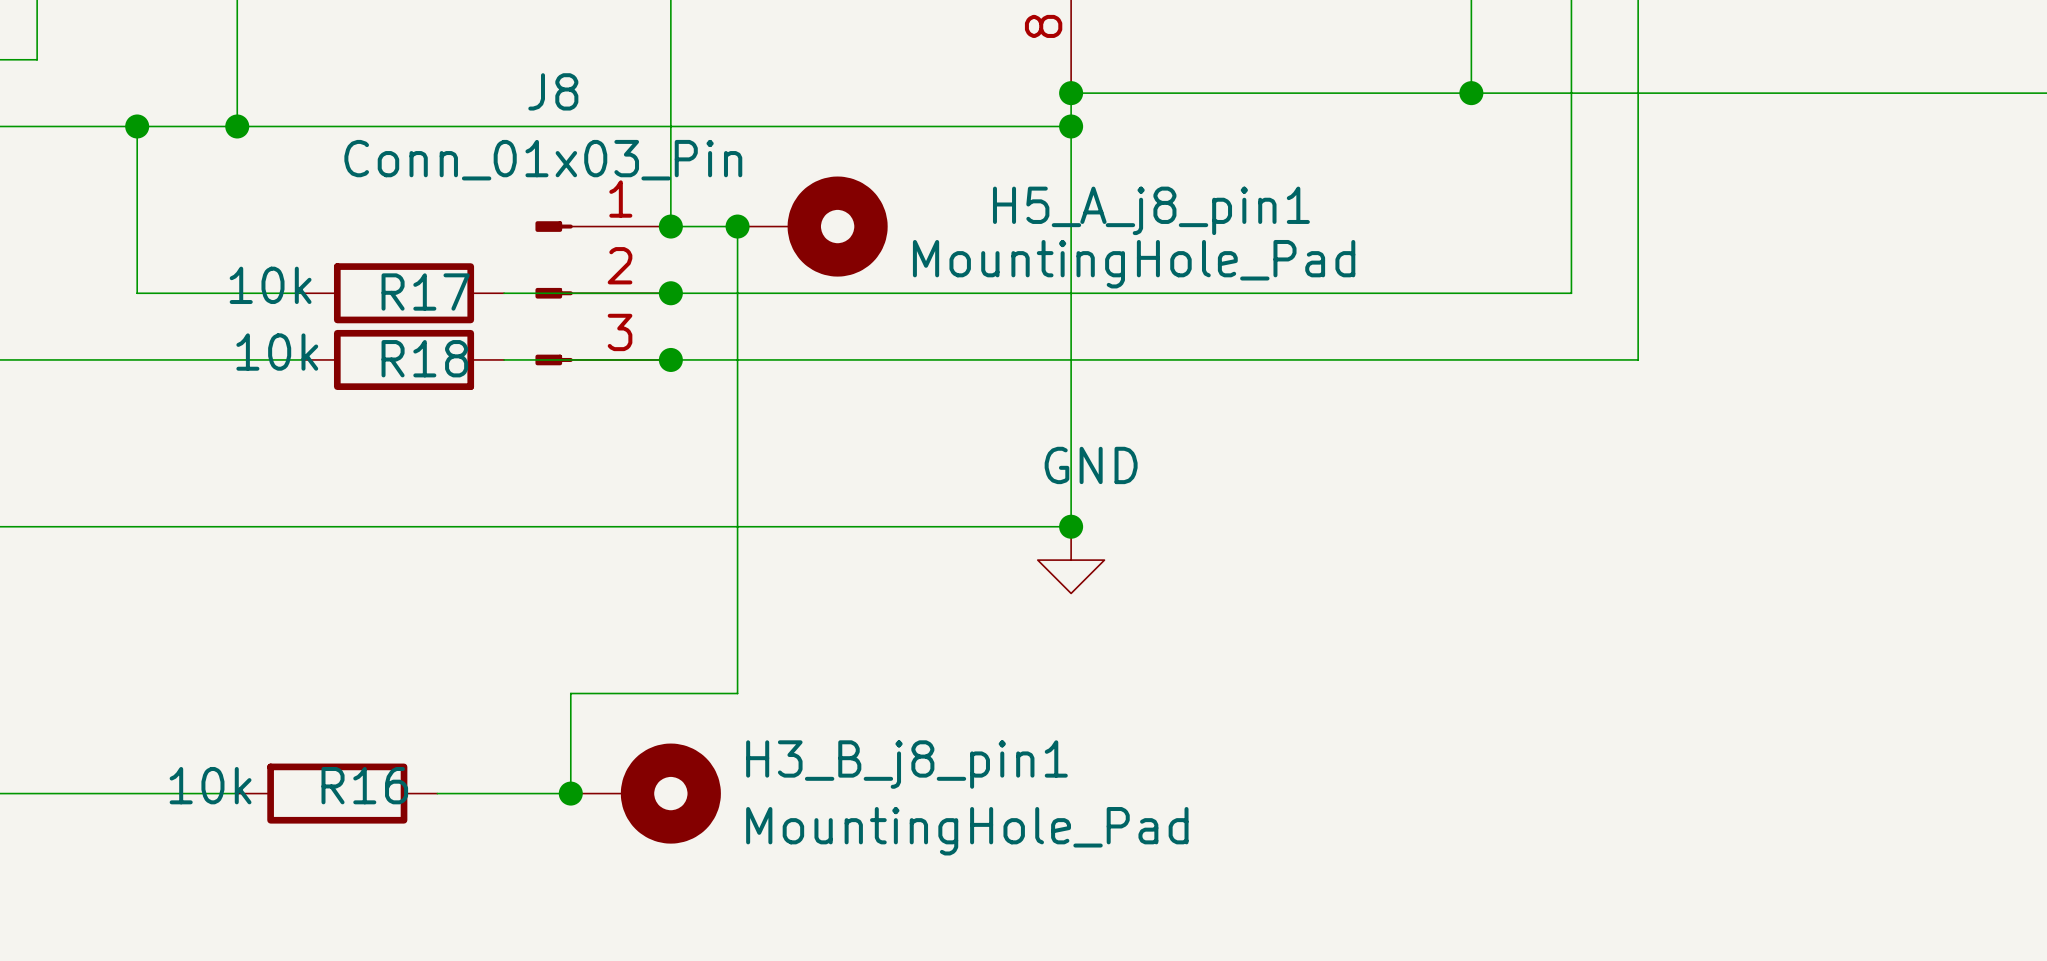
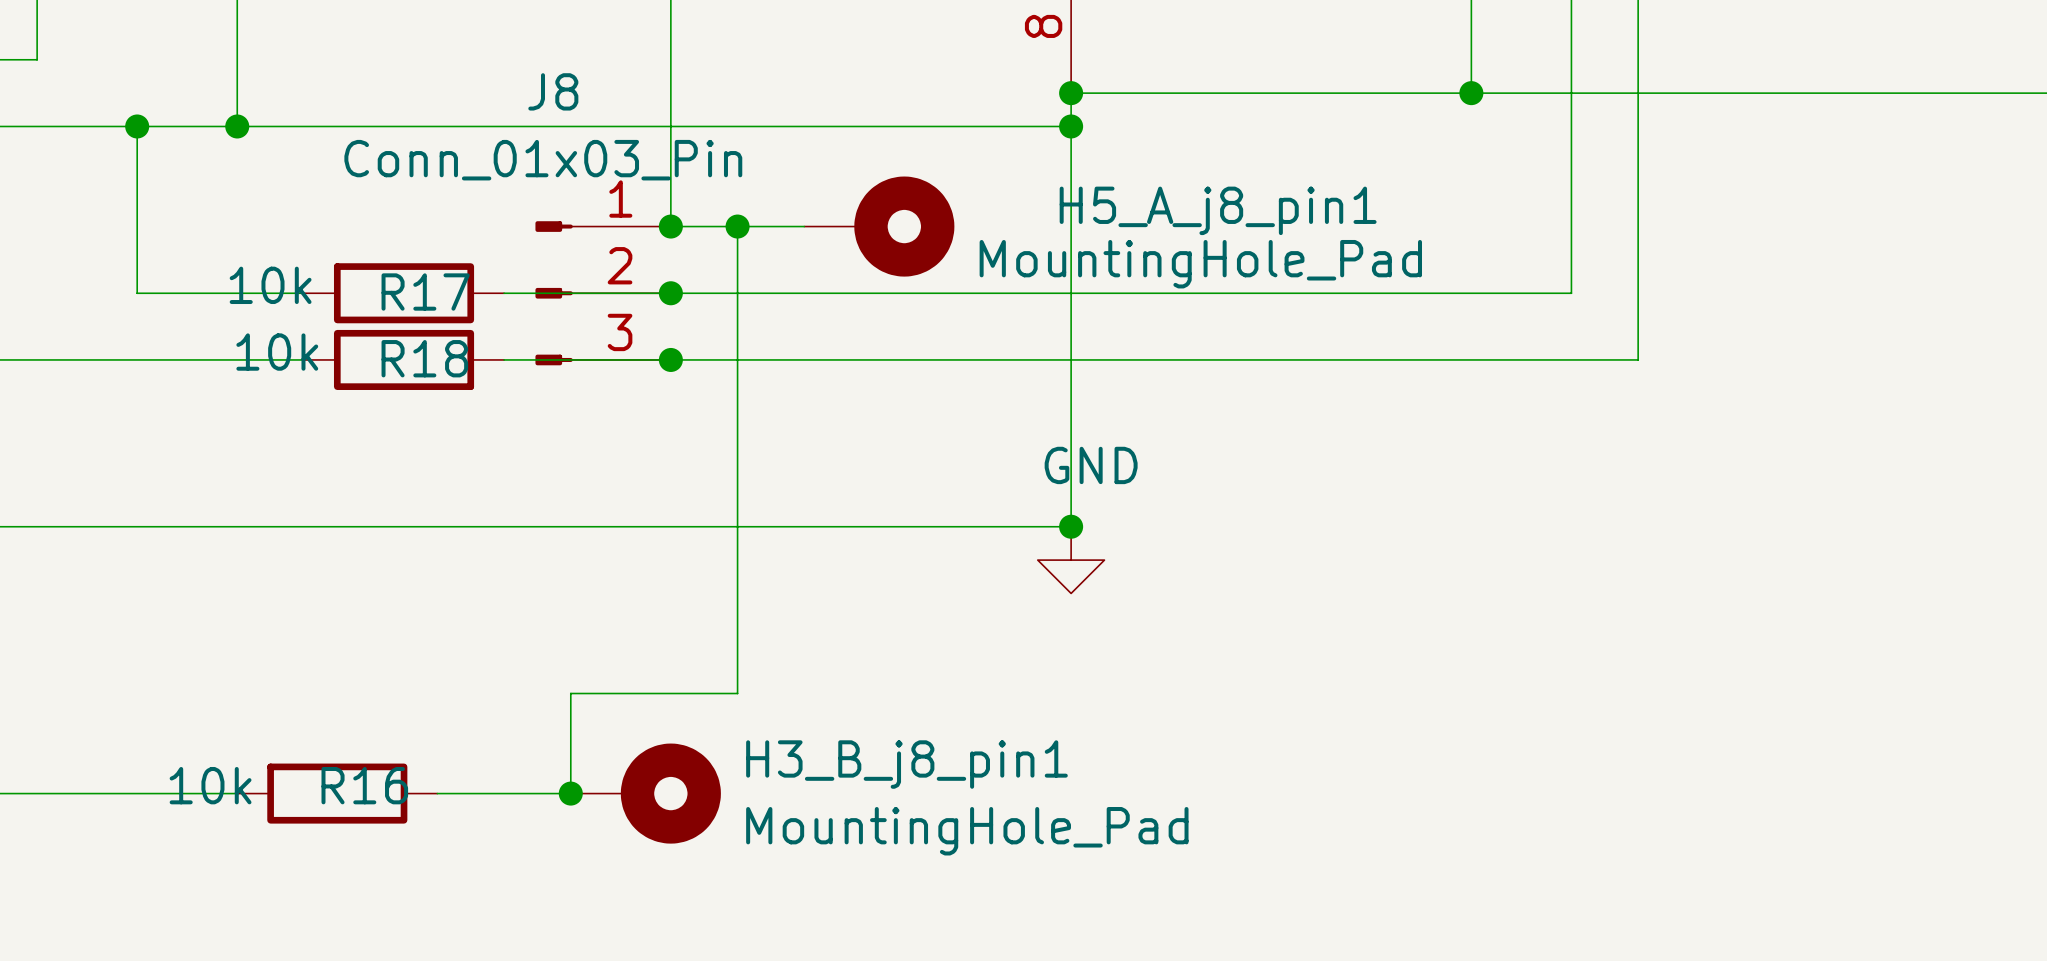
H5_A_j8_pin1 position: (812, 226) -> (879, 226)

